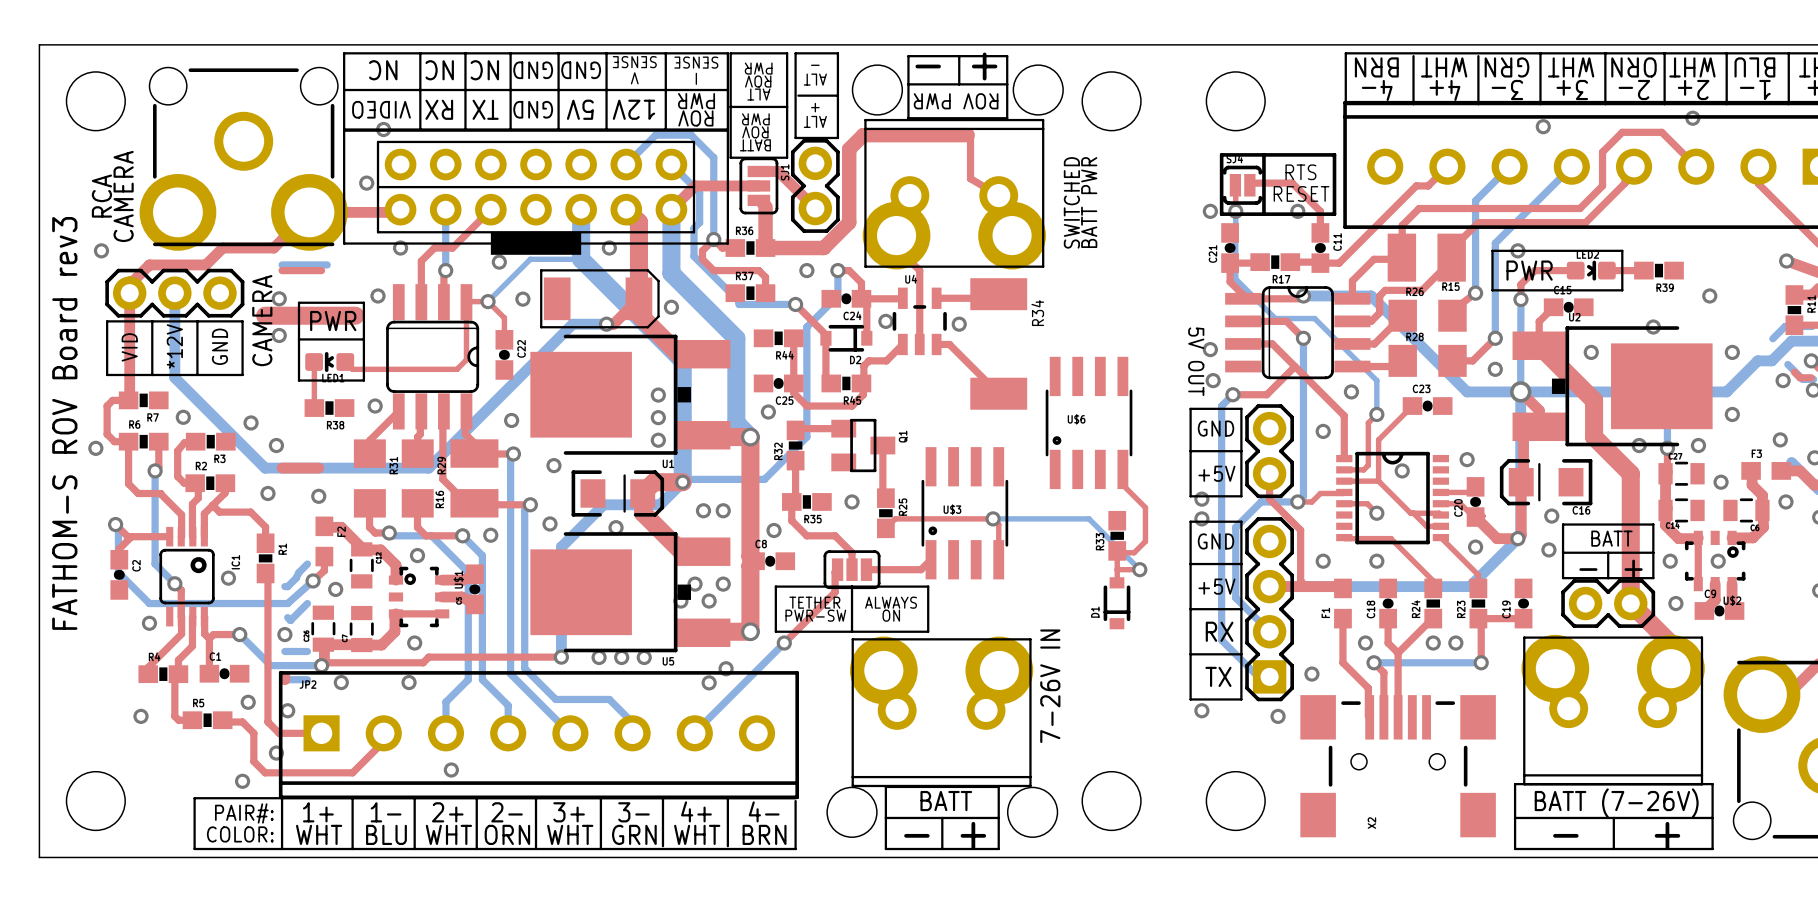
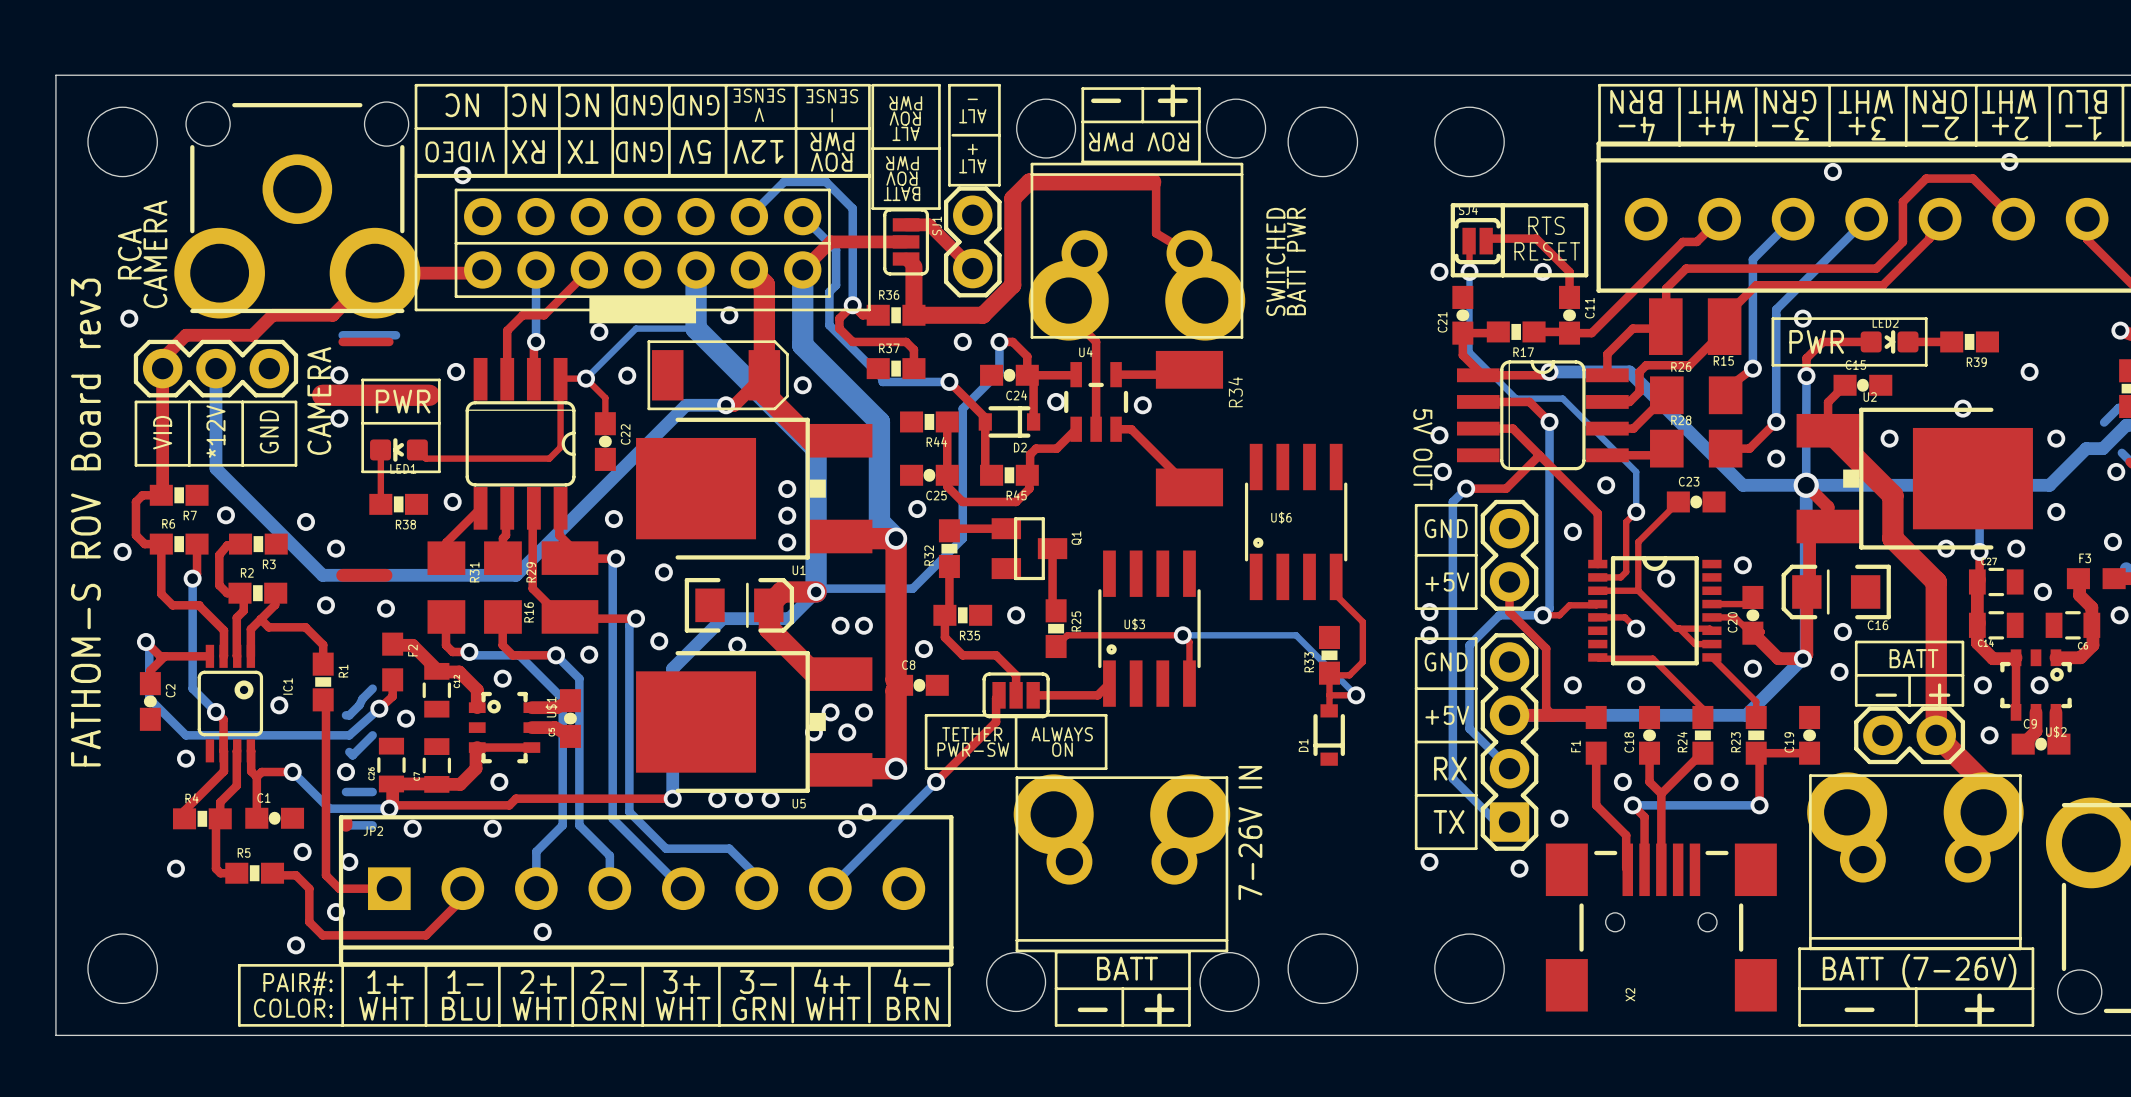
via: (366, 183) -> none
via: (400, 248) -> none

